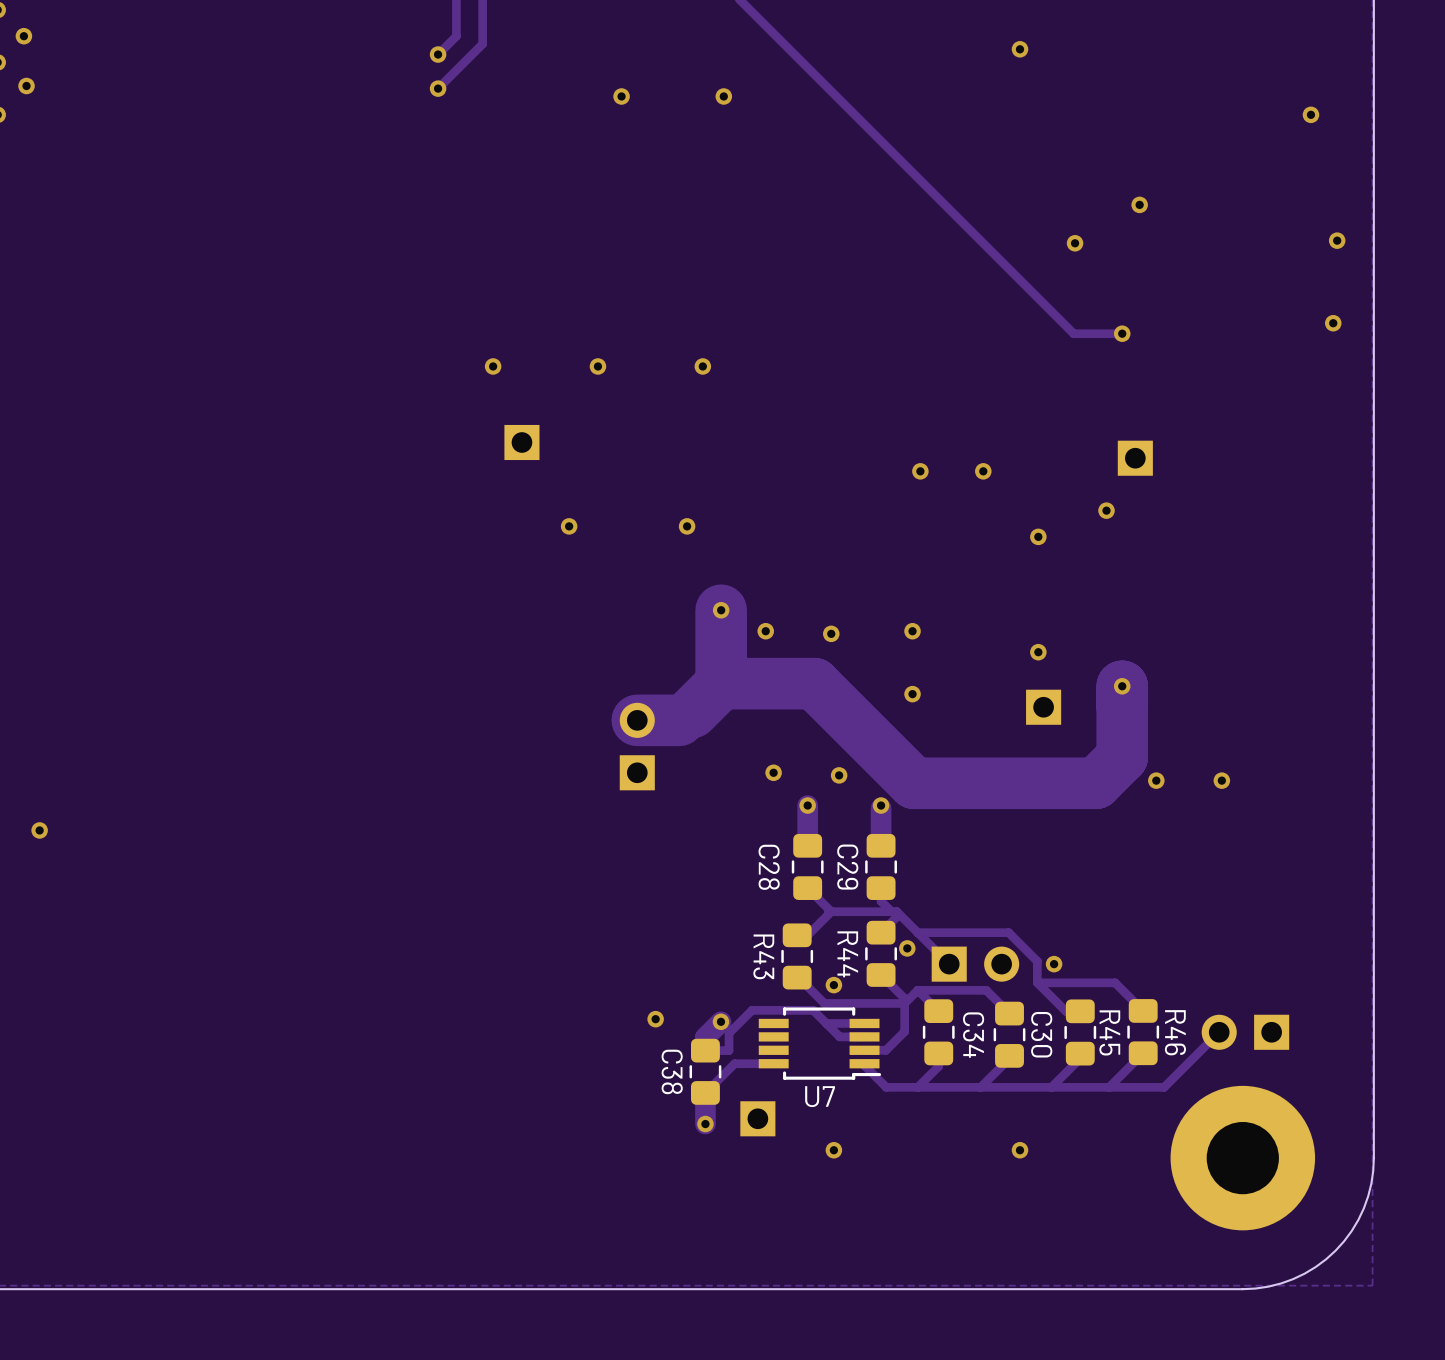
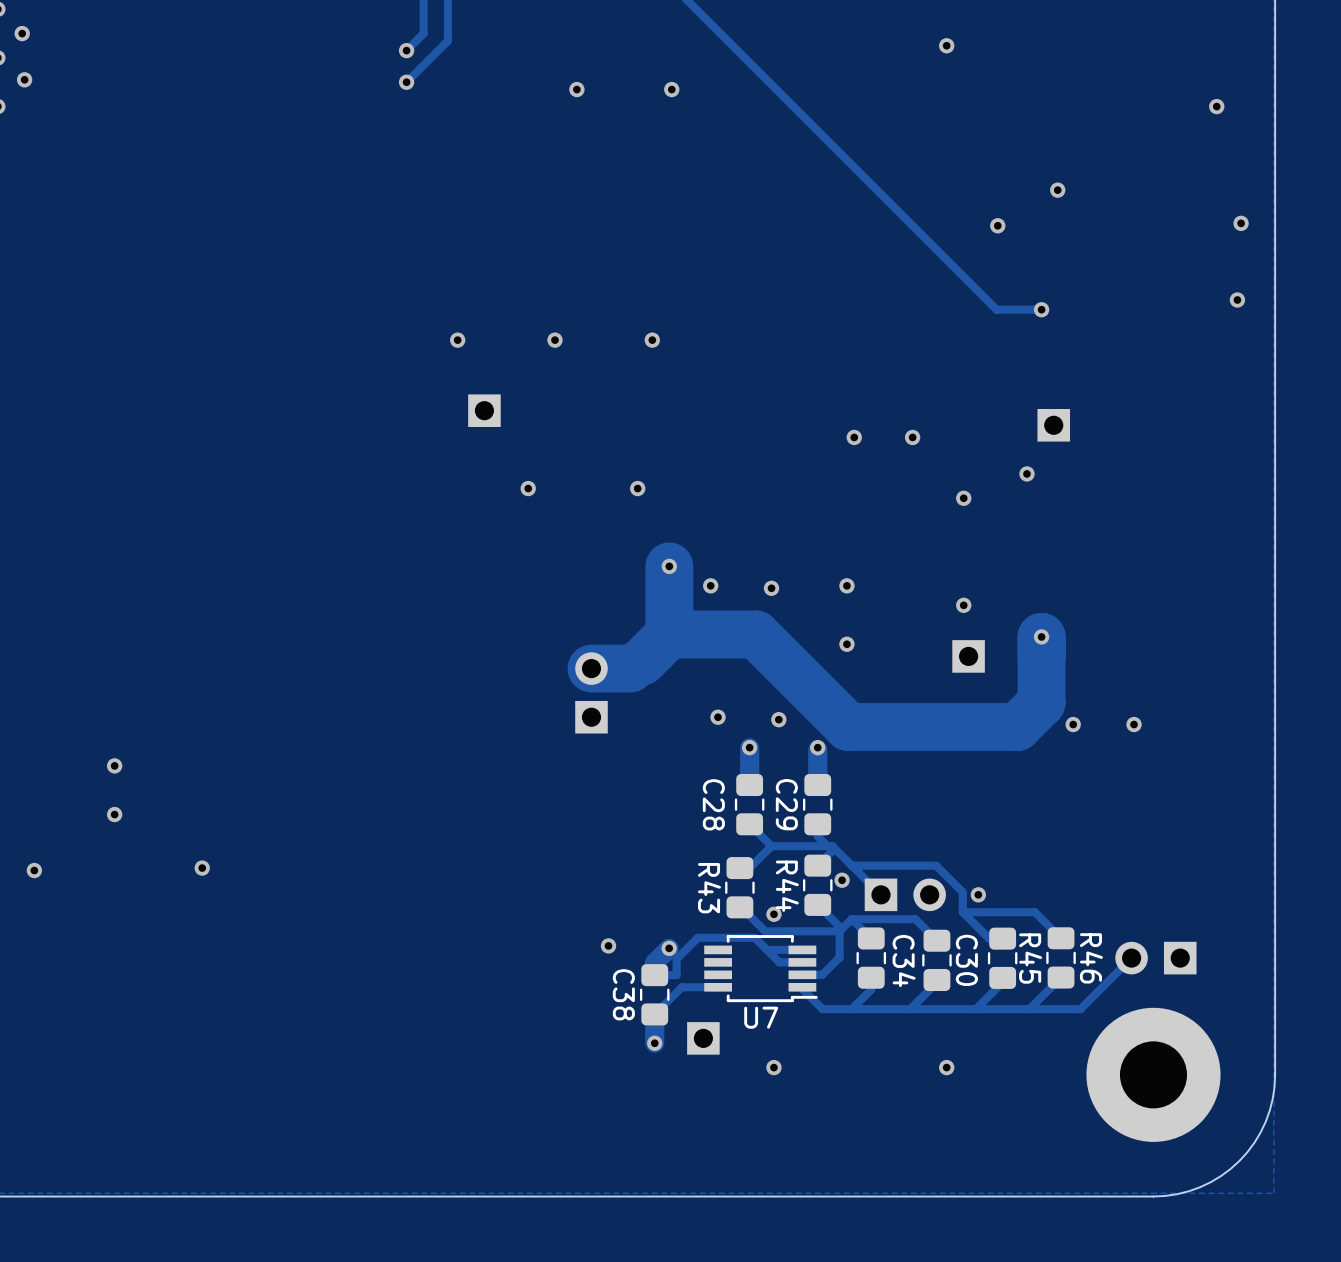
via: none -> (114, 765)
via: (39, 830) -> none
via: none -> (114, 814)
via: none -> (202, 868)
via: none -> (34, 870)

